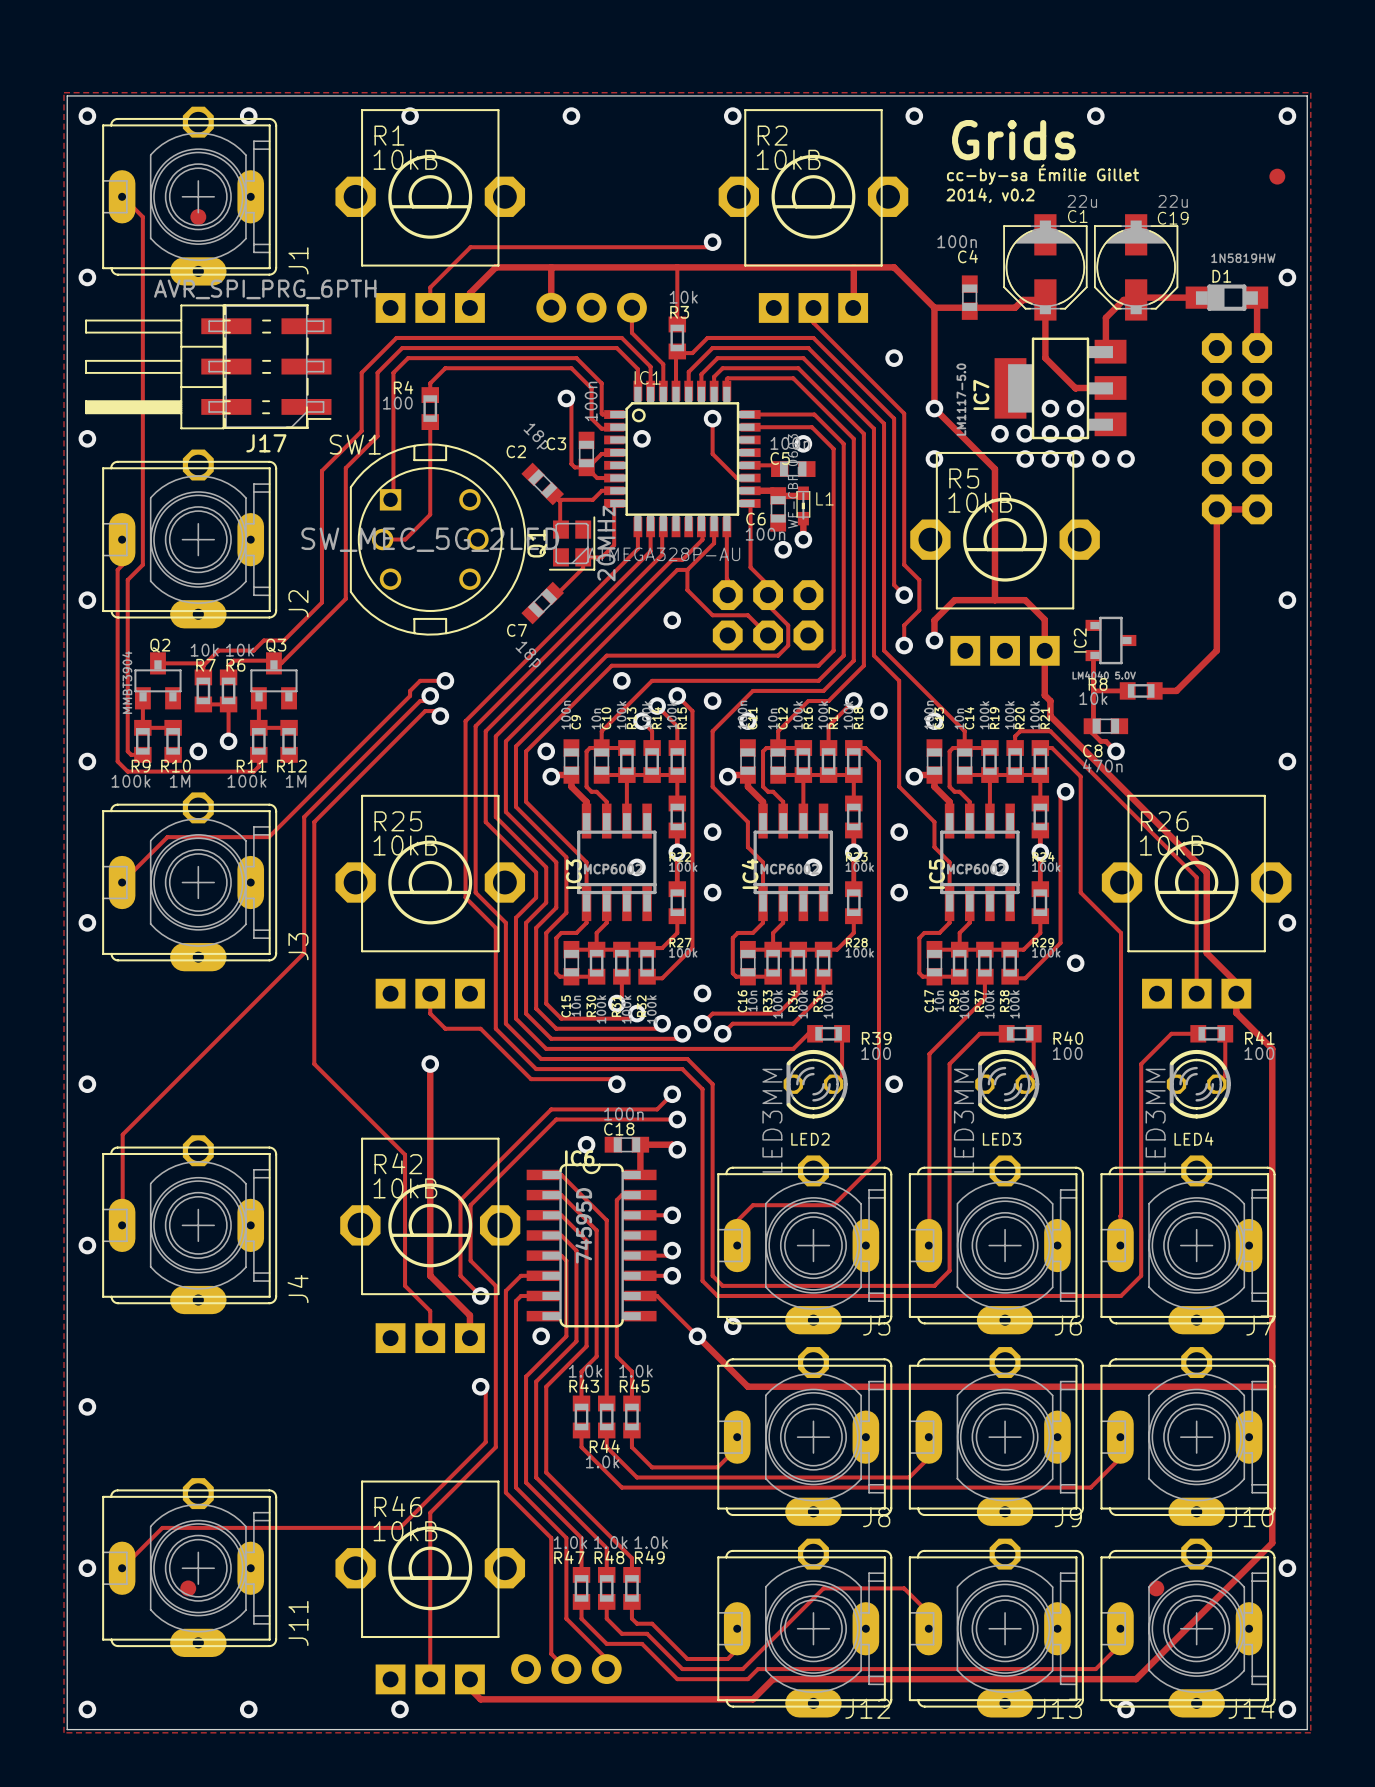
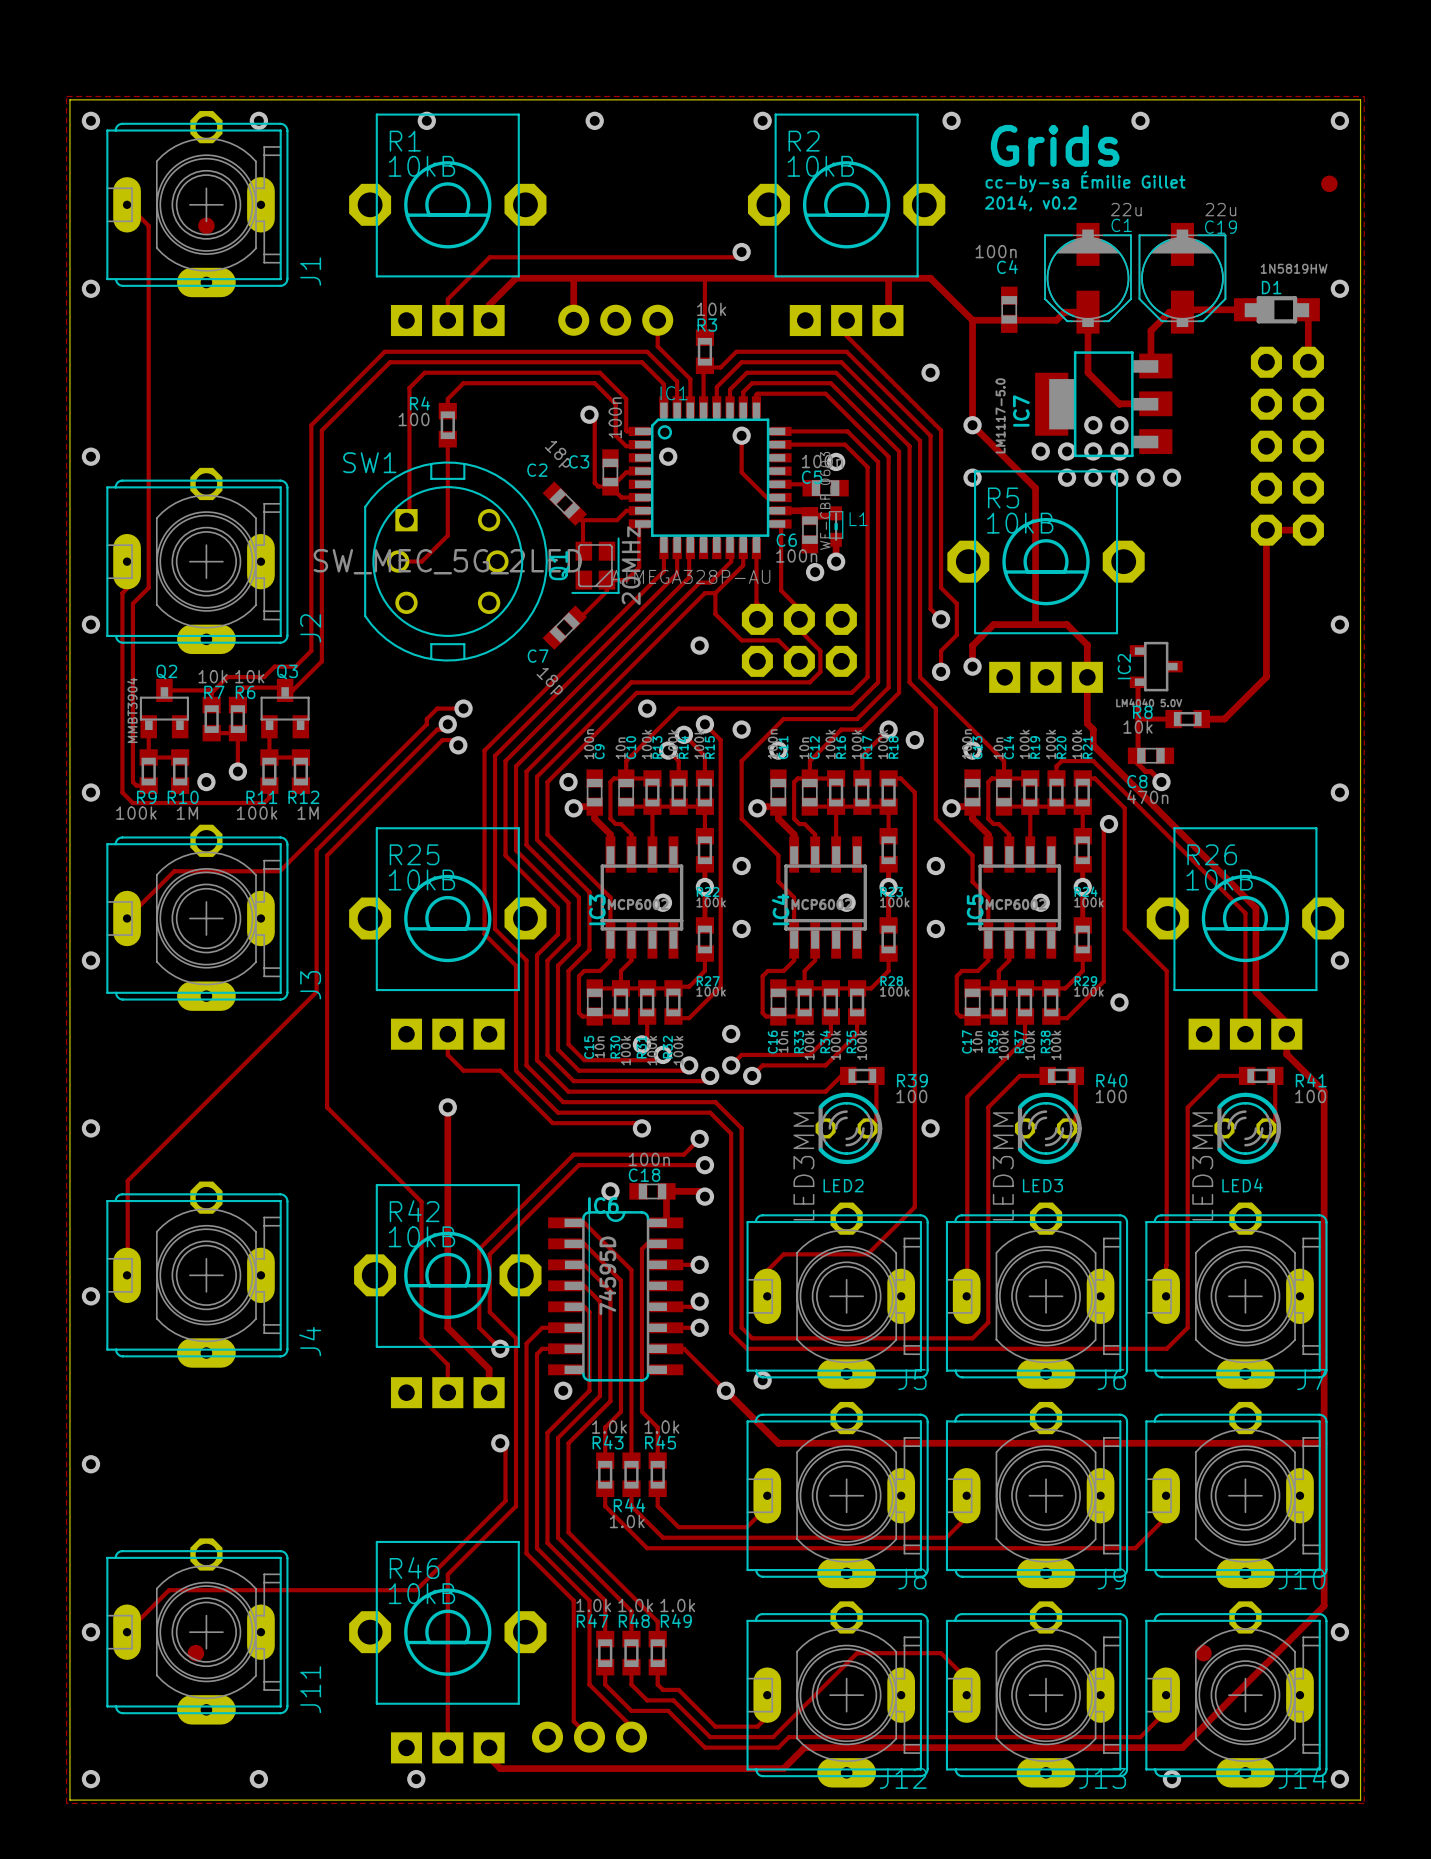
track: (396, 337) (361, 372) (361, 431) (321, 470) (321, 602) (299, 625) -> (412, 351) (384, 351) (311, 425) (311, 650)
track: (402, 348) (377, 372) (377, 436) (345, 468) (345, 598) (309, 635) -> (418, 362) (390, 362) (321, 430) (321, 661)
J17: AVR_SPI_PRG_6PTH (208, 366) -> none

